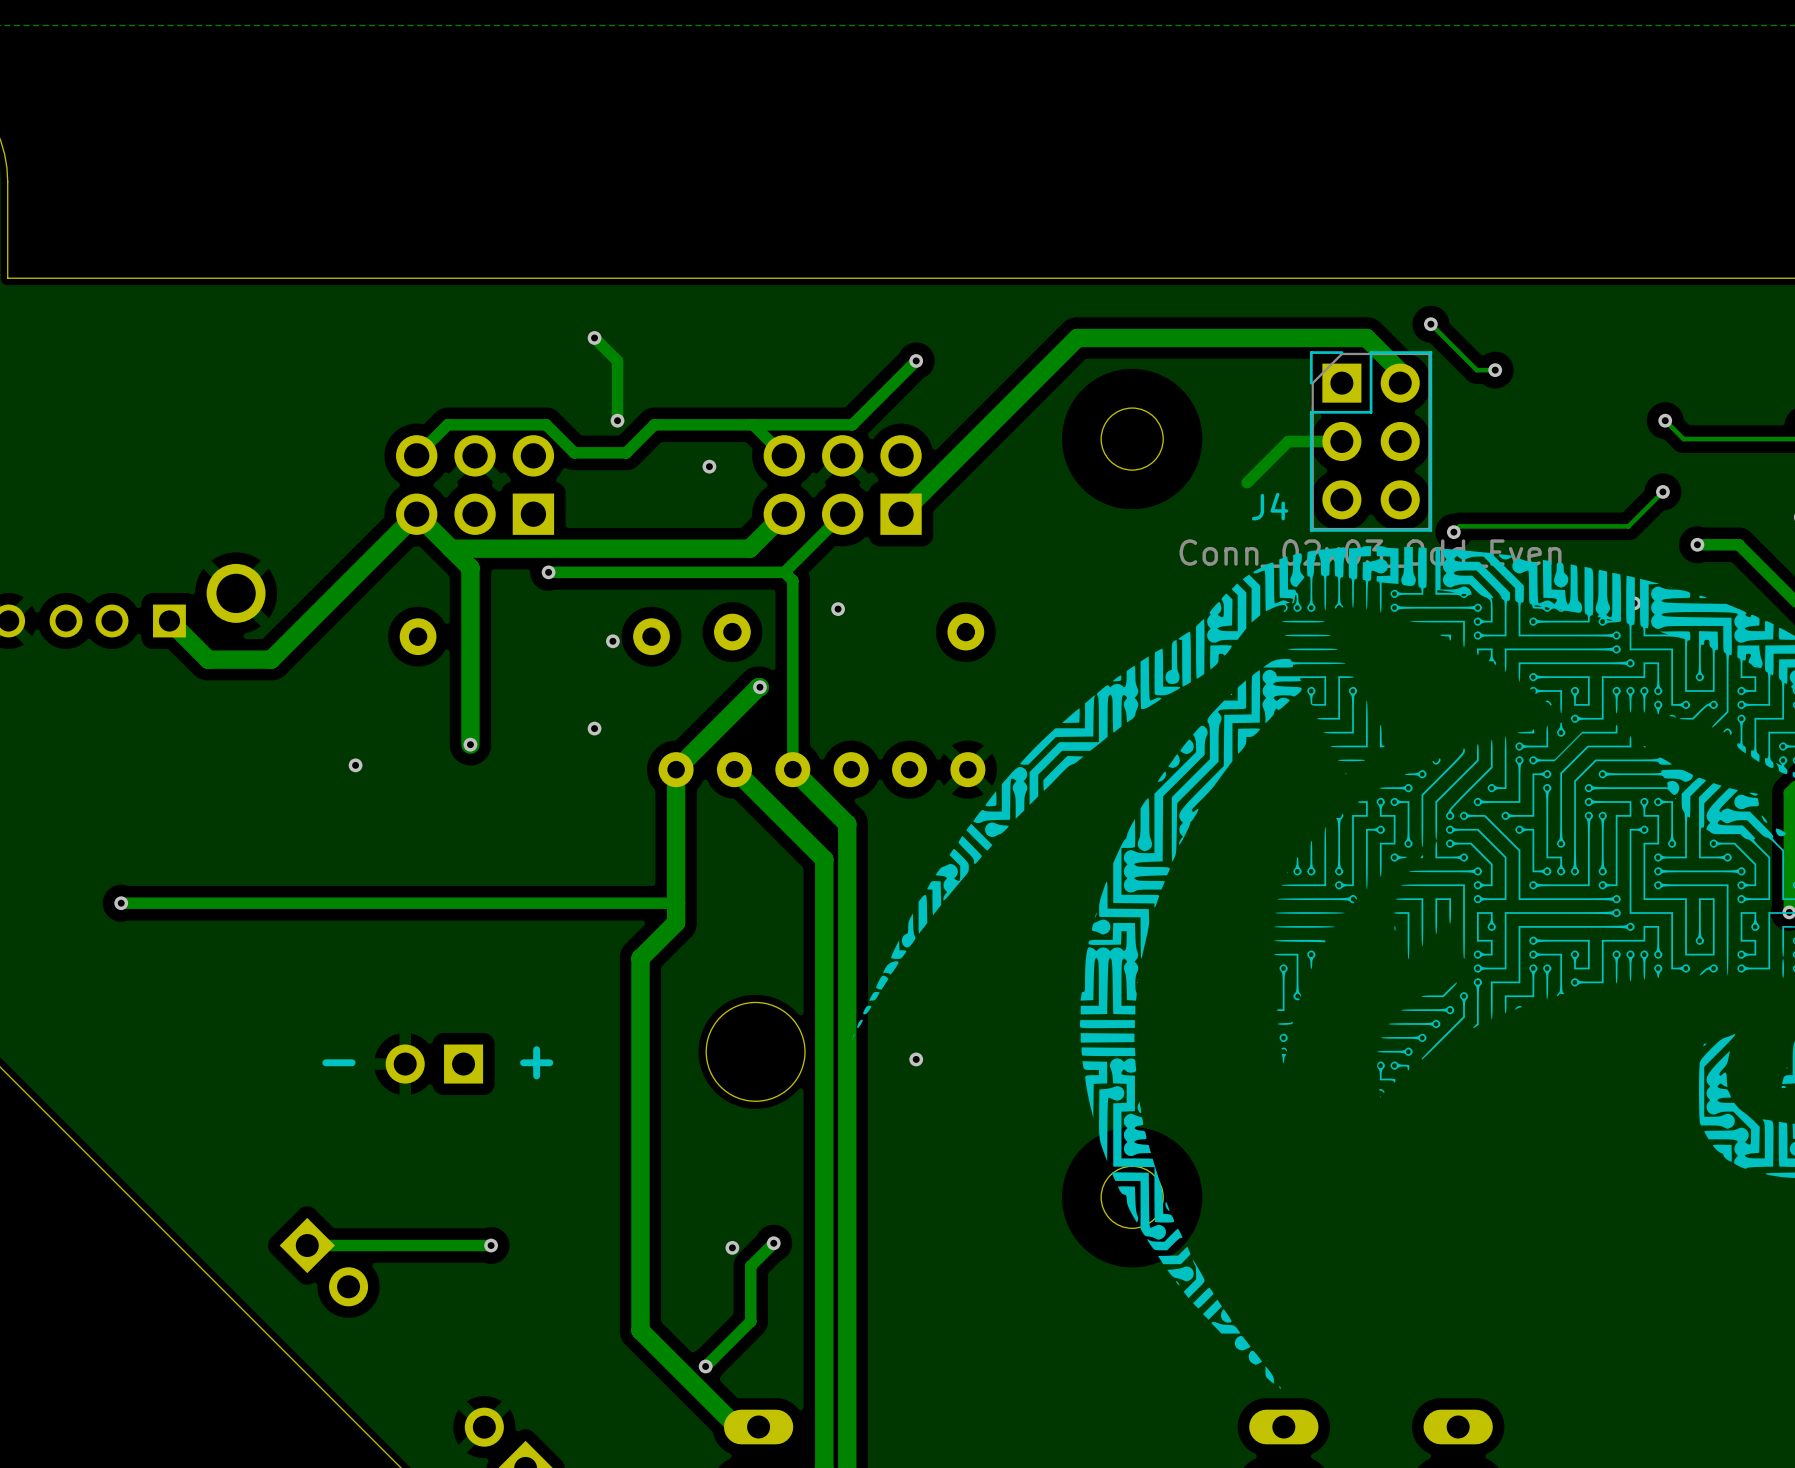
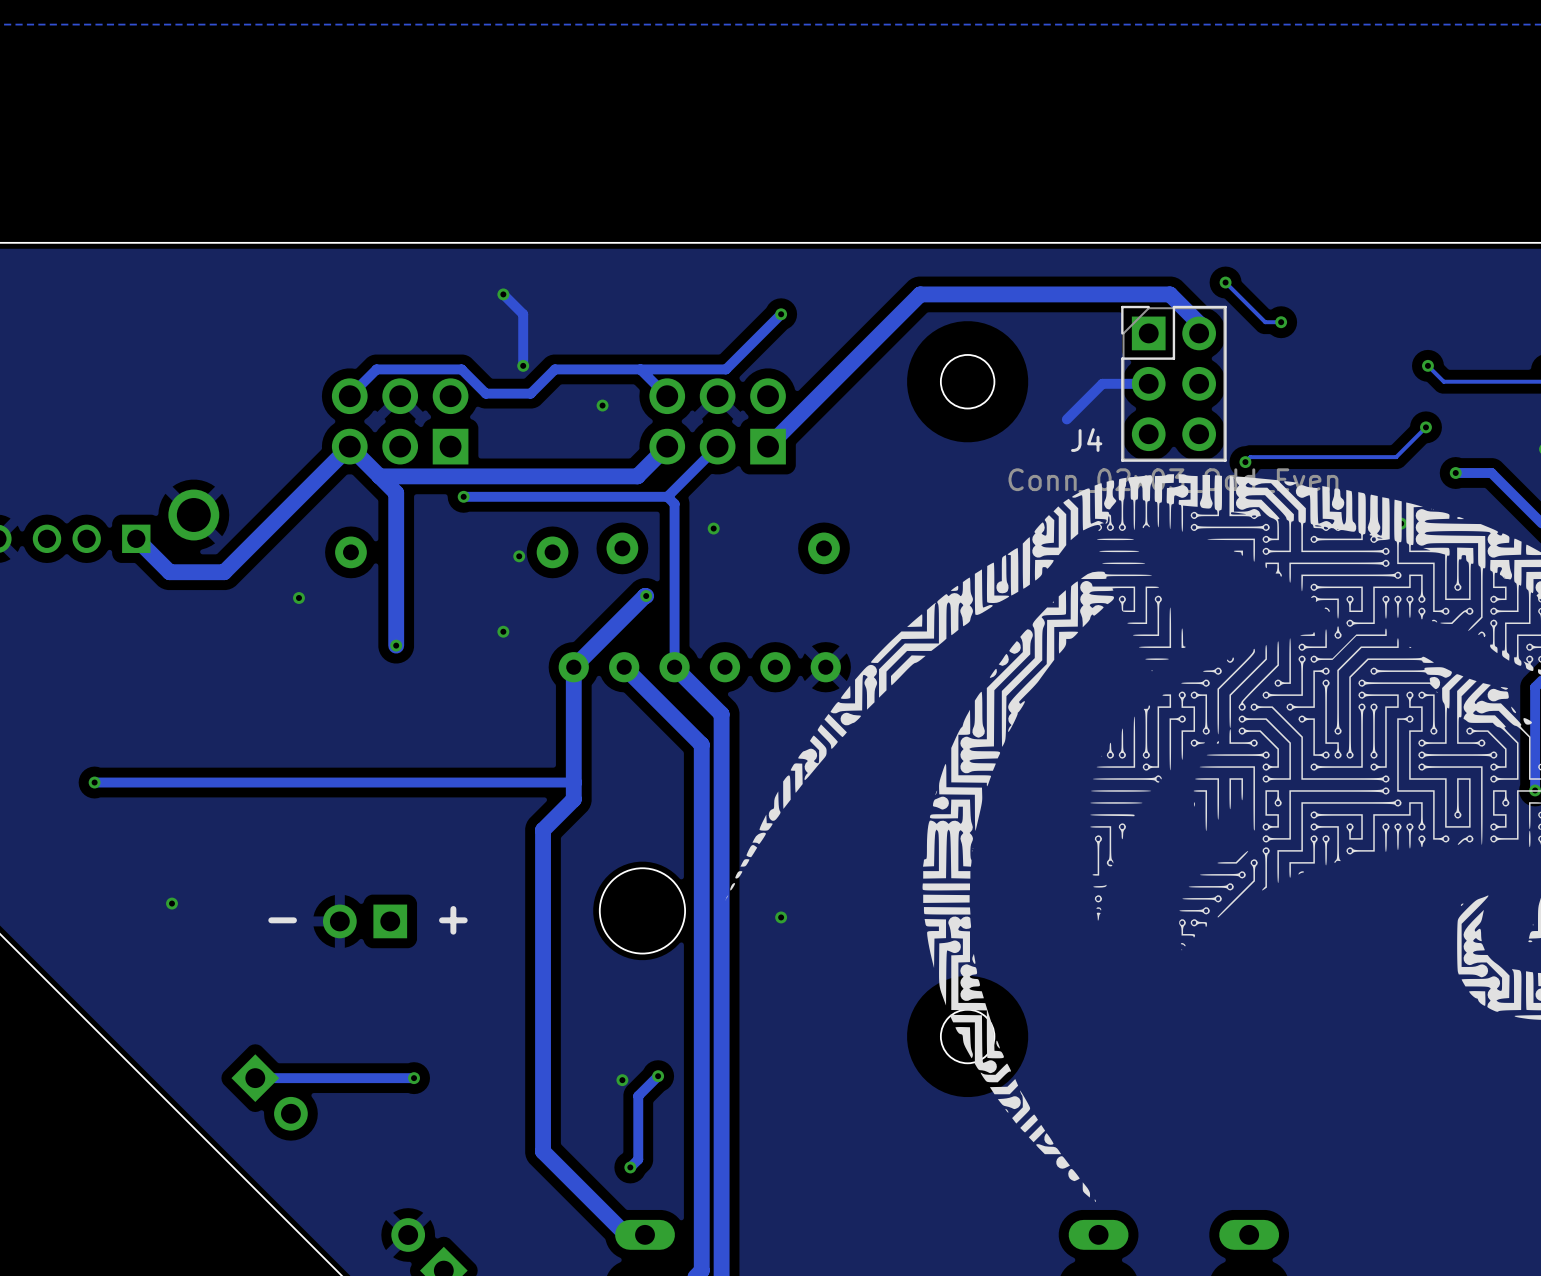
via position: (355, 765) -> (298, 598)
via: none -> (171, 903)
track: (750, 1321) (705, 1366) -> (638, 1143) (638, 1159) (630, 1167)
via position: (705, 1366) -> (630, 1167)

